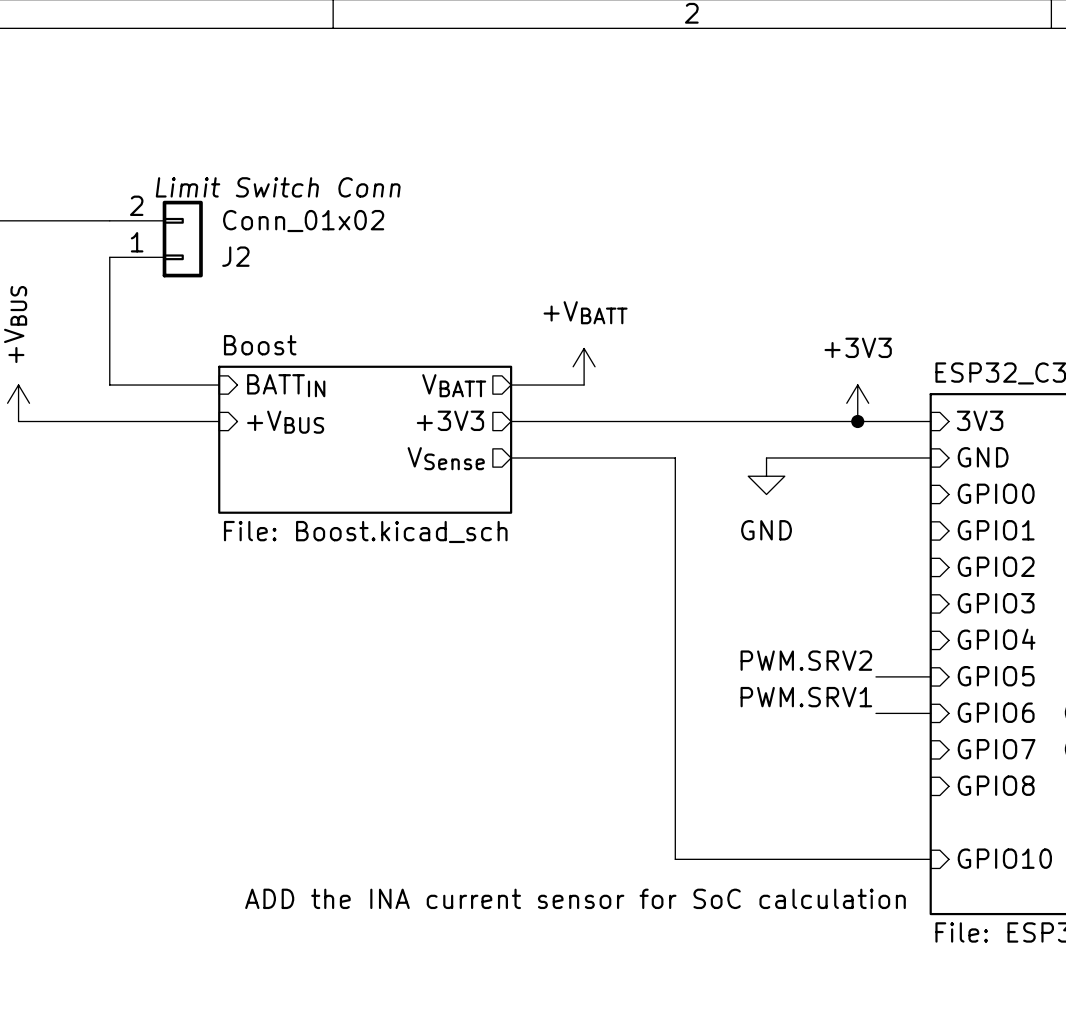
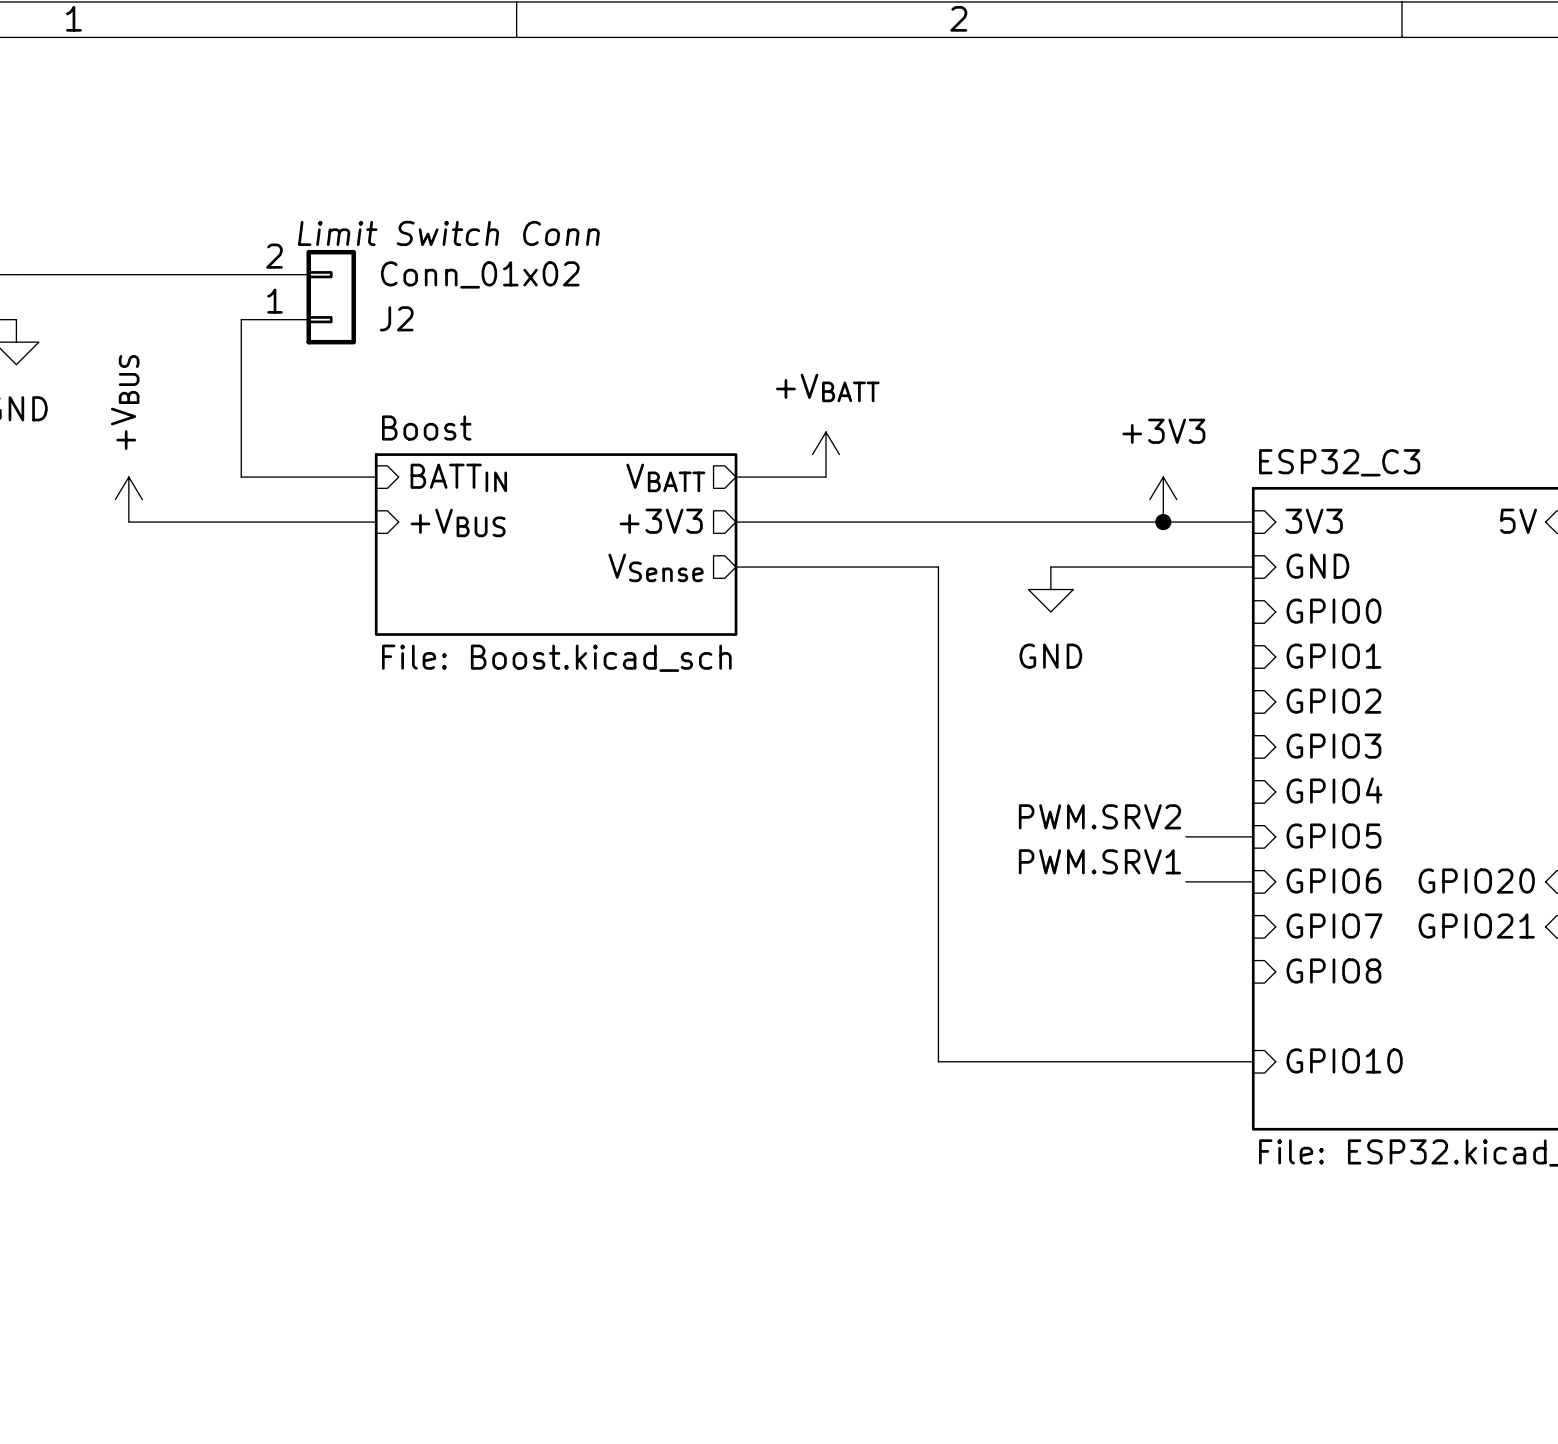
text: ADD the INA current sensor for SoC calculation (575, 898) -> none

